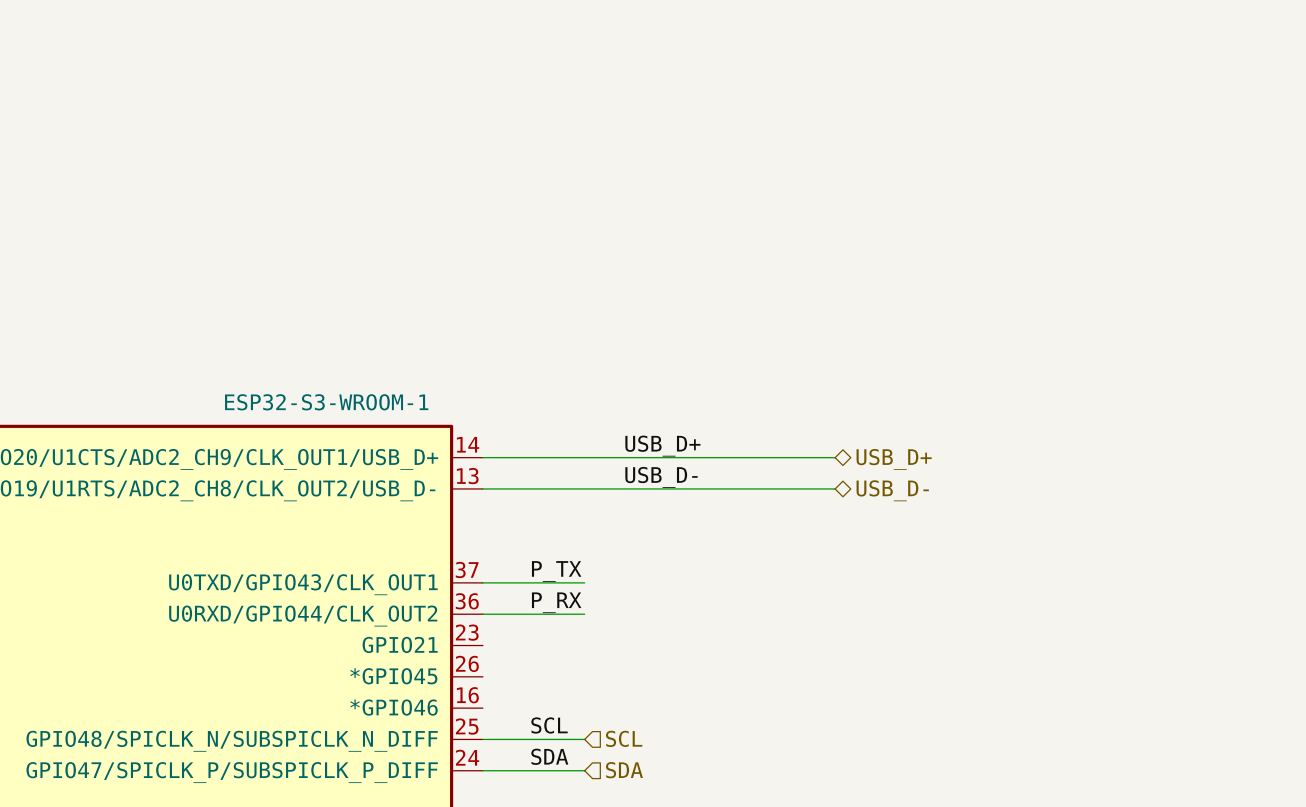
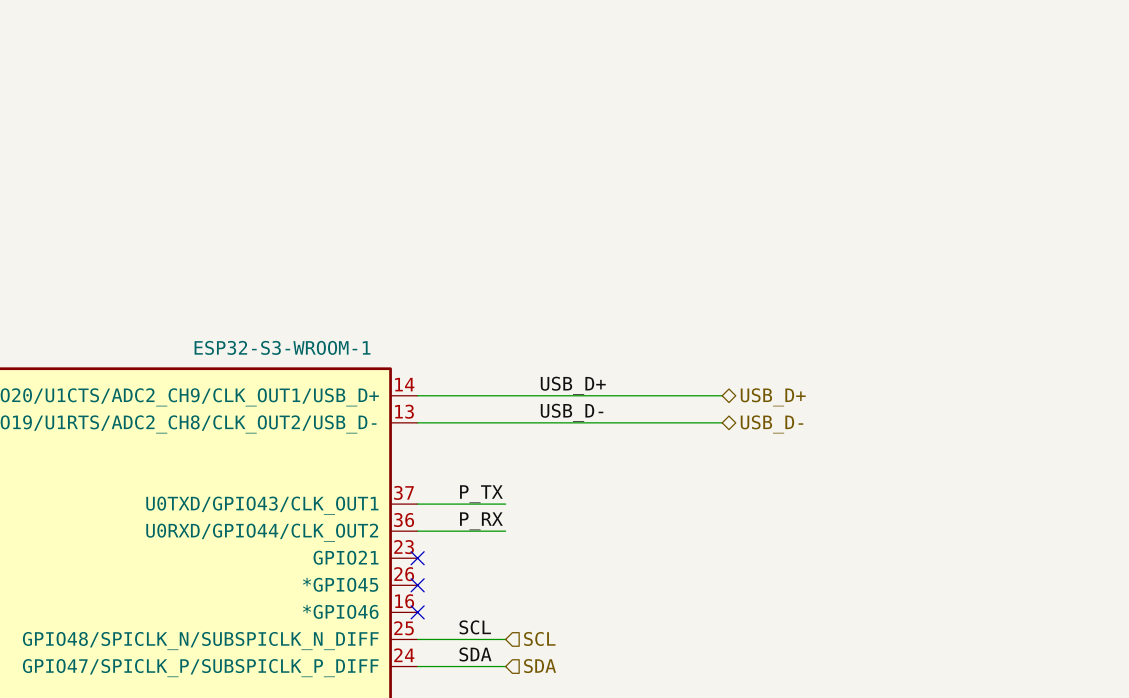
no-connect mark: none -> (417, 558)
no-connect mark: none -> (417, 585)
no-connect mark: none -> (417, 612)

